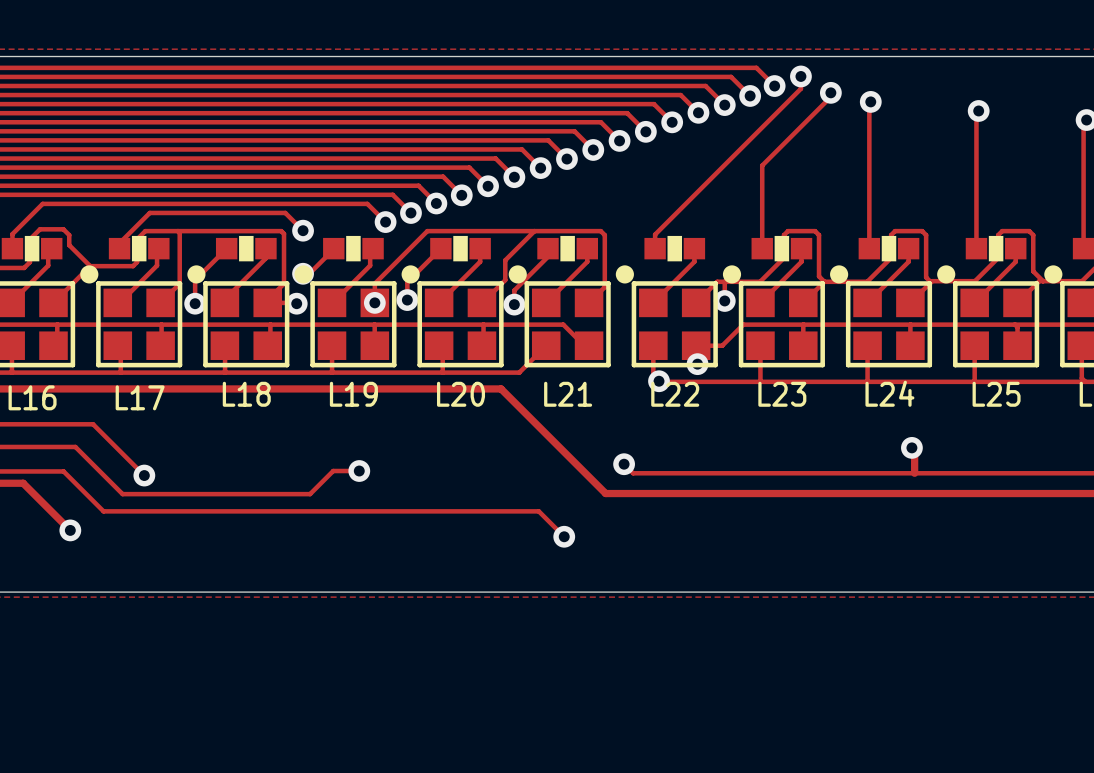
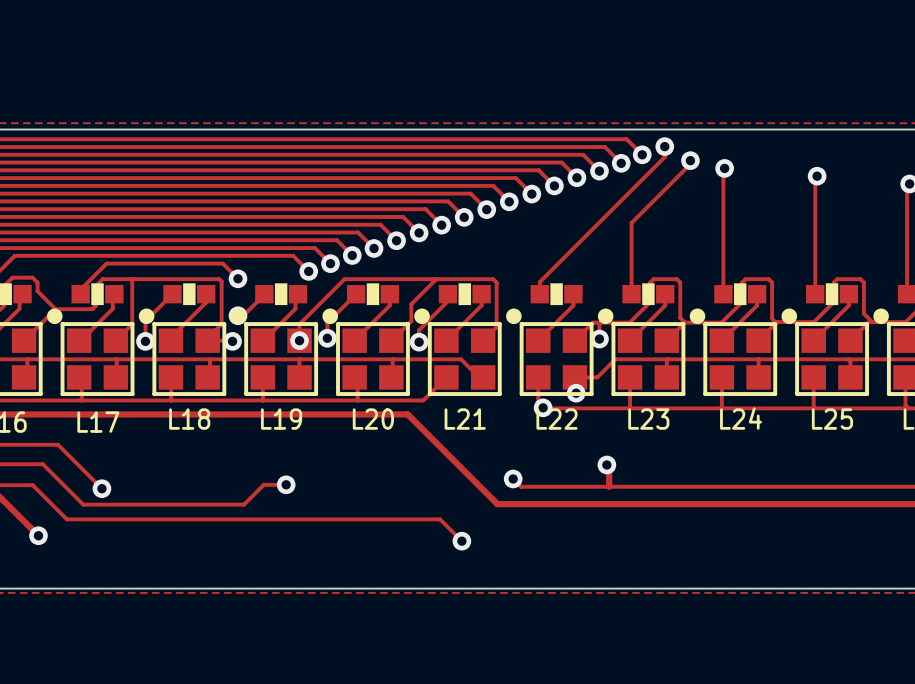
track: (911, 447) (914, 450) (914, 473) -> (606, 464) (609, 467) (609, 486)
via position: (911, 447) -> (606, 464)

